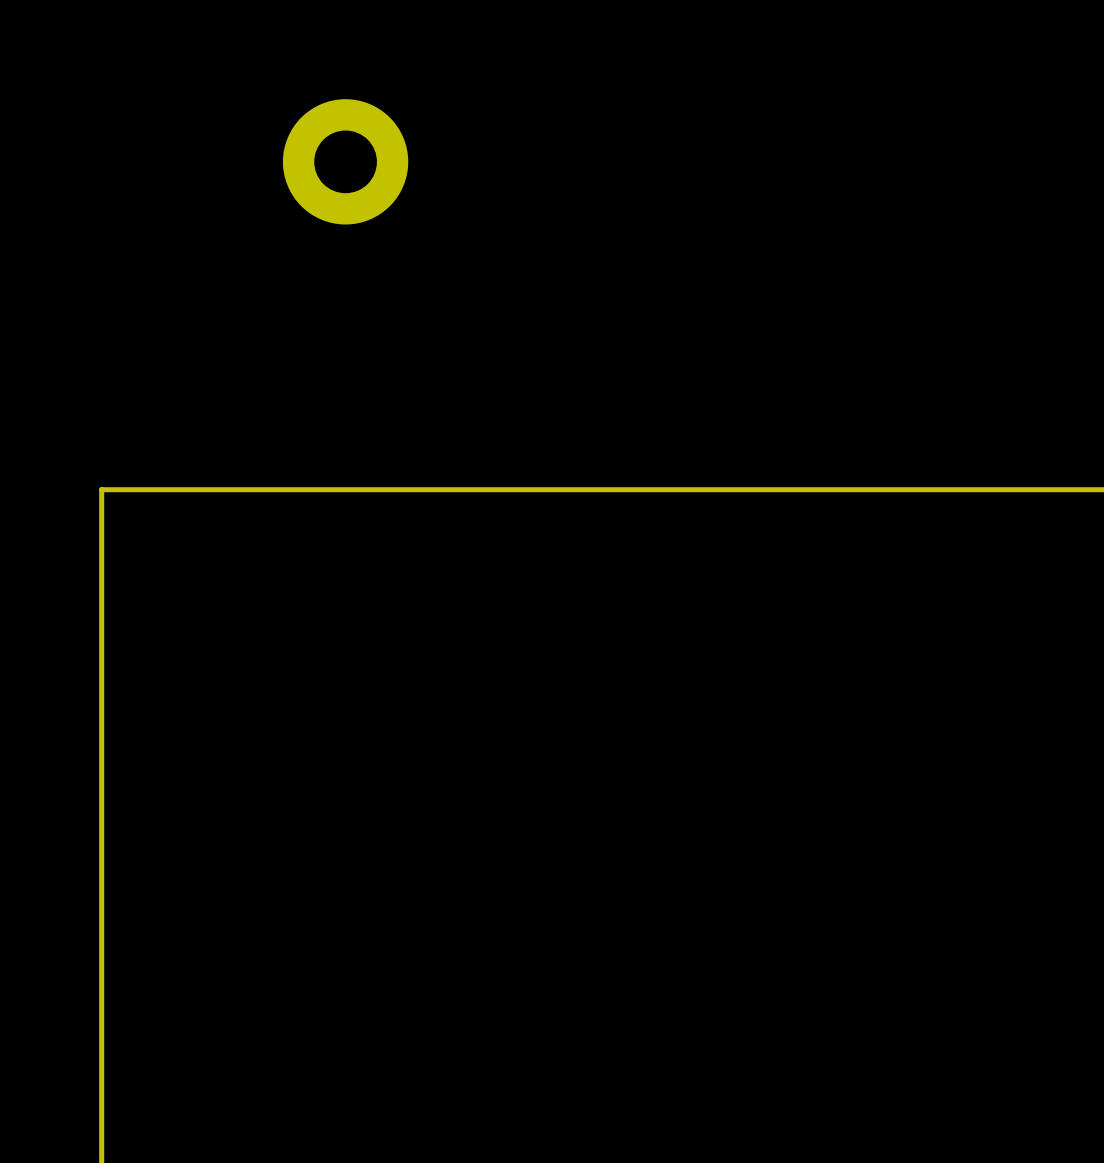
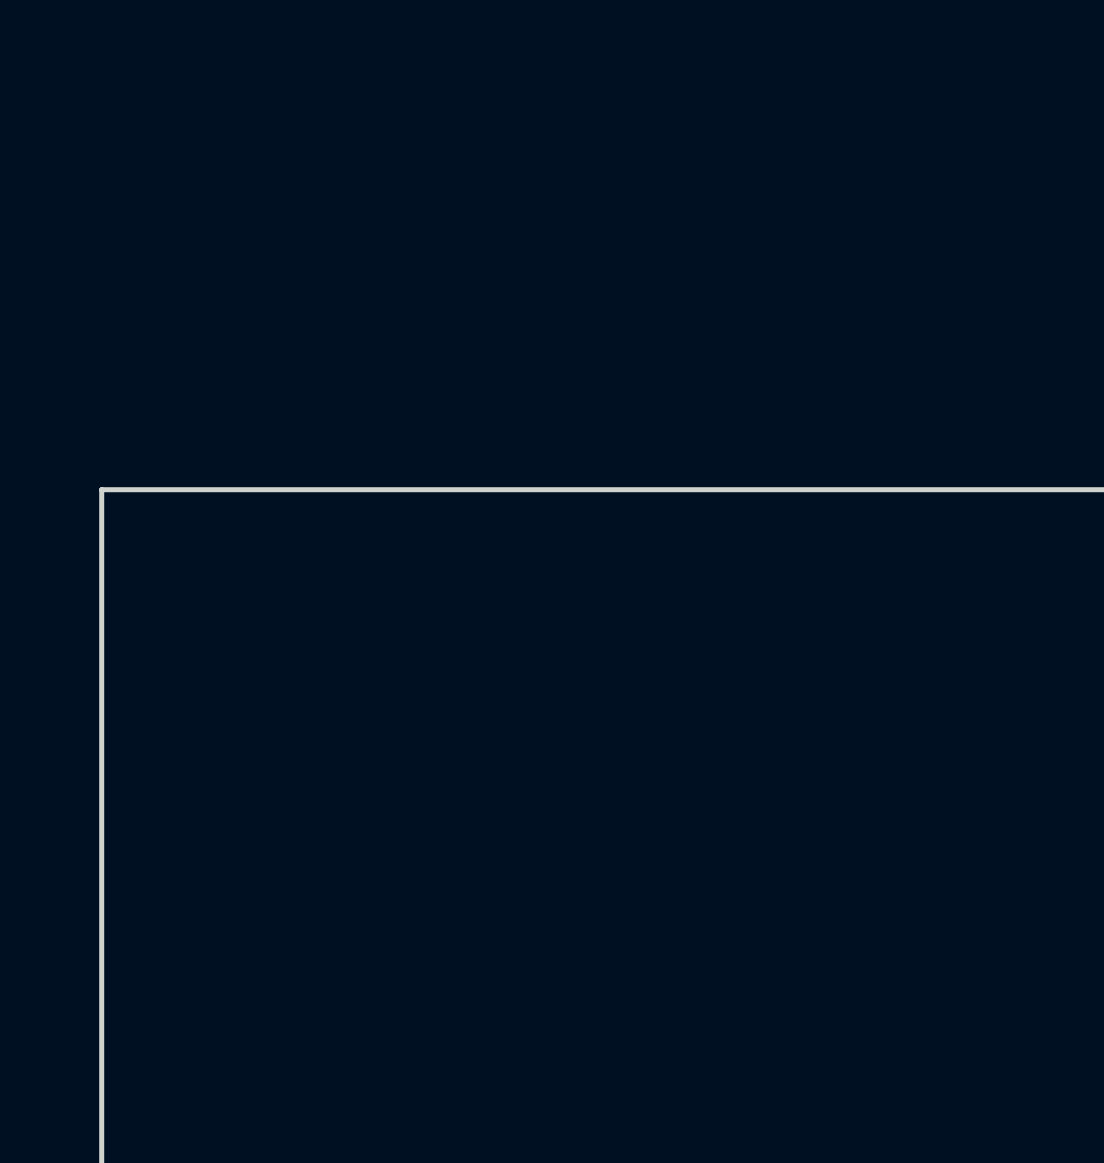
part: (345, 161) -> none

